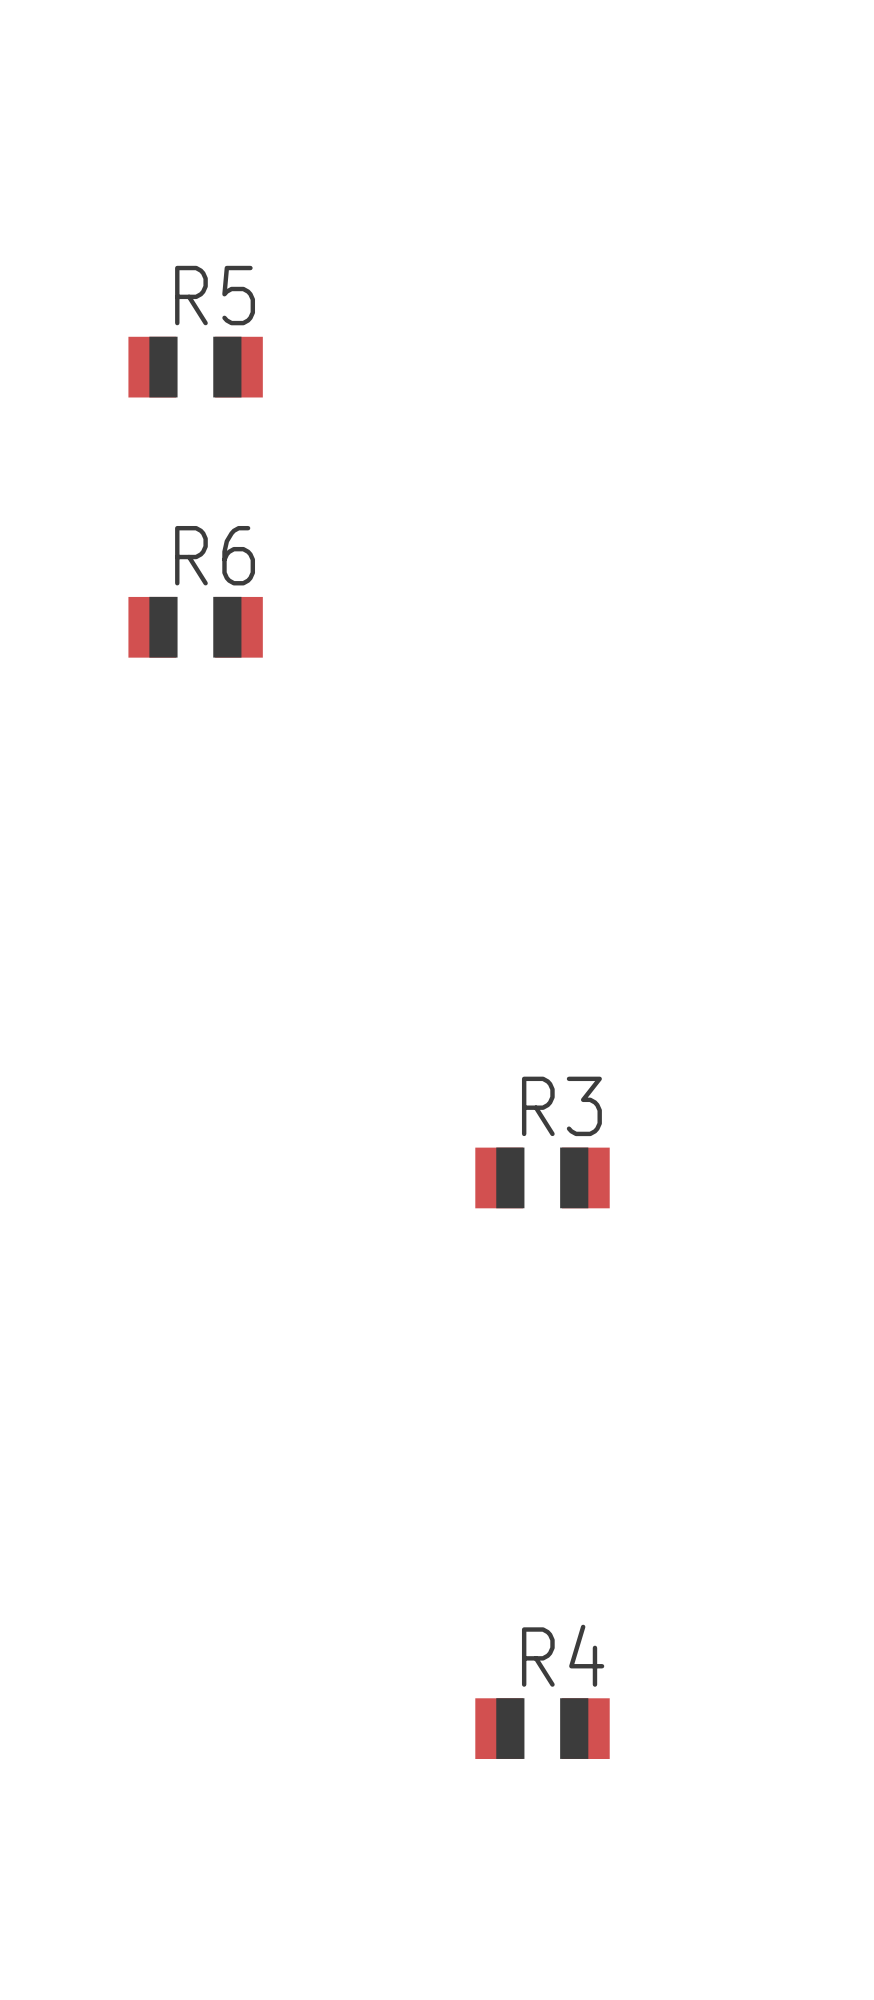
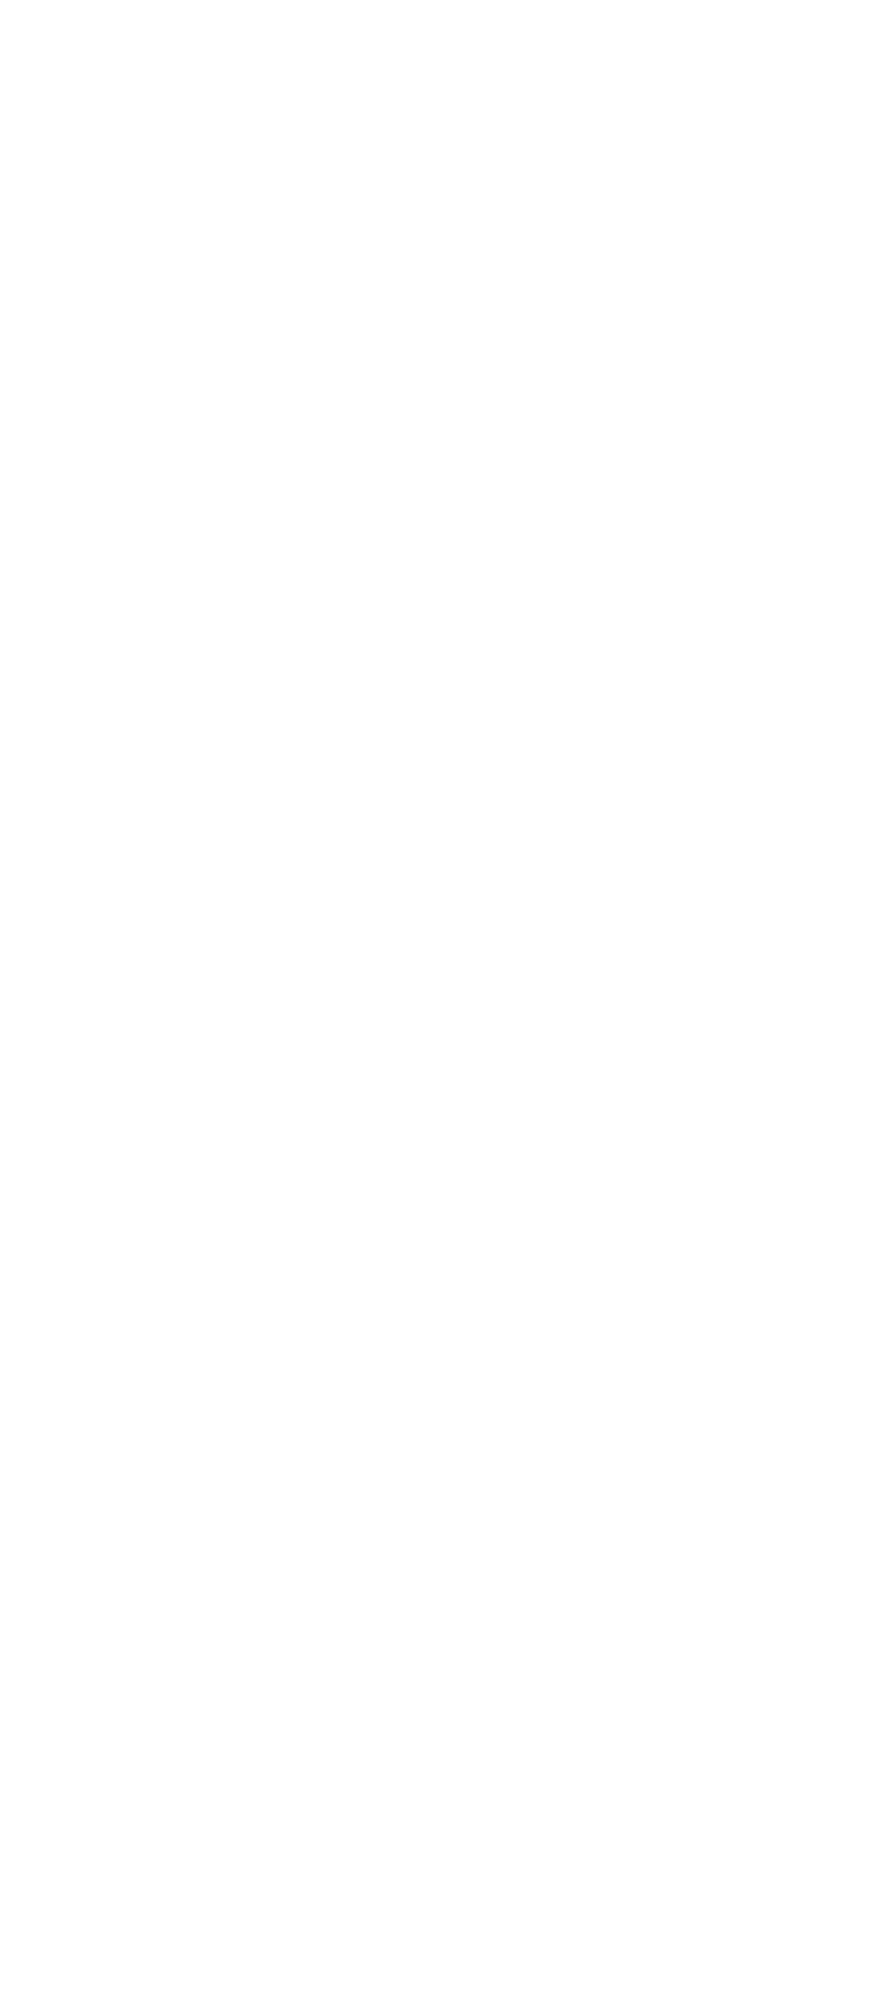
R5: (195, 367) -> none
R6: (195, 627) -> none
R3: (542, 1177) -> none
R4: (542, 1728) -> none

